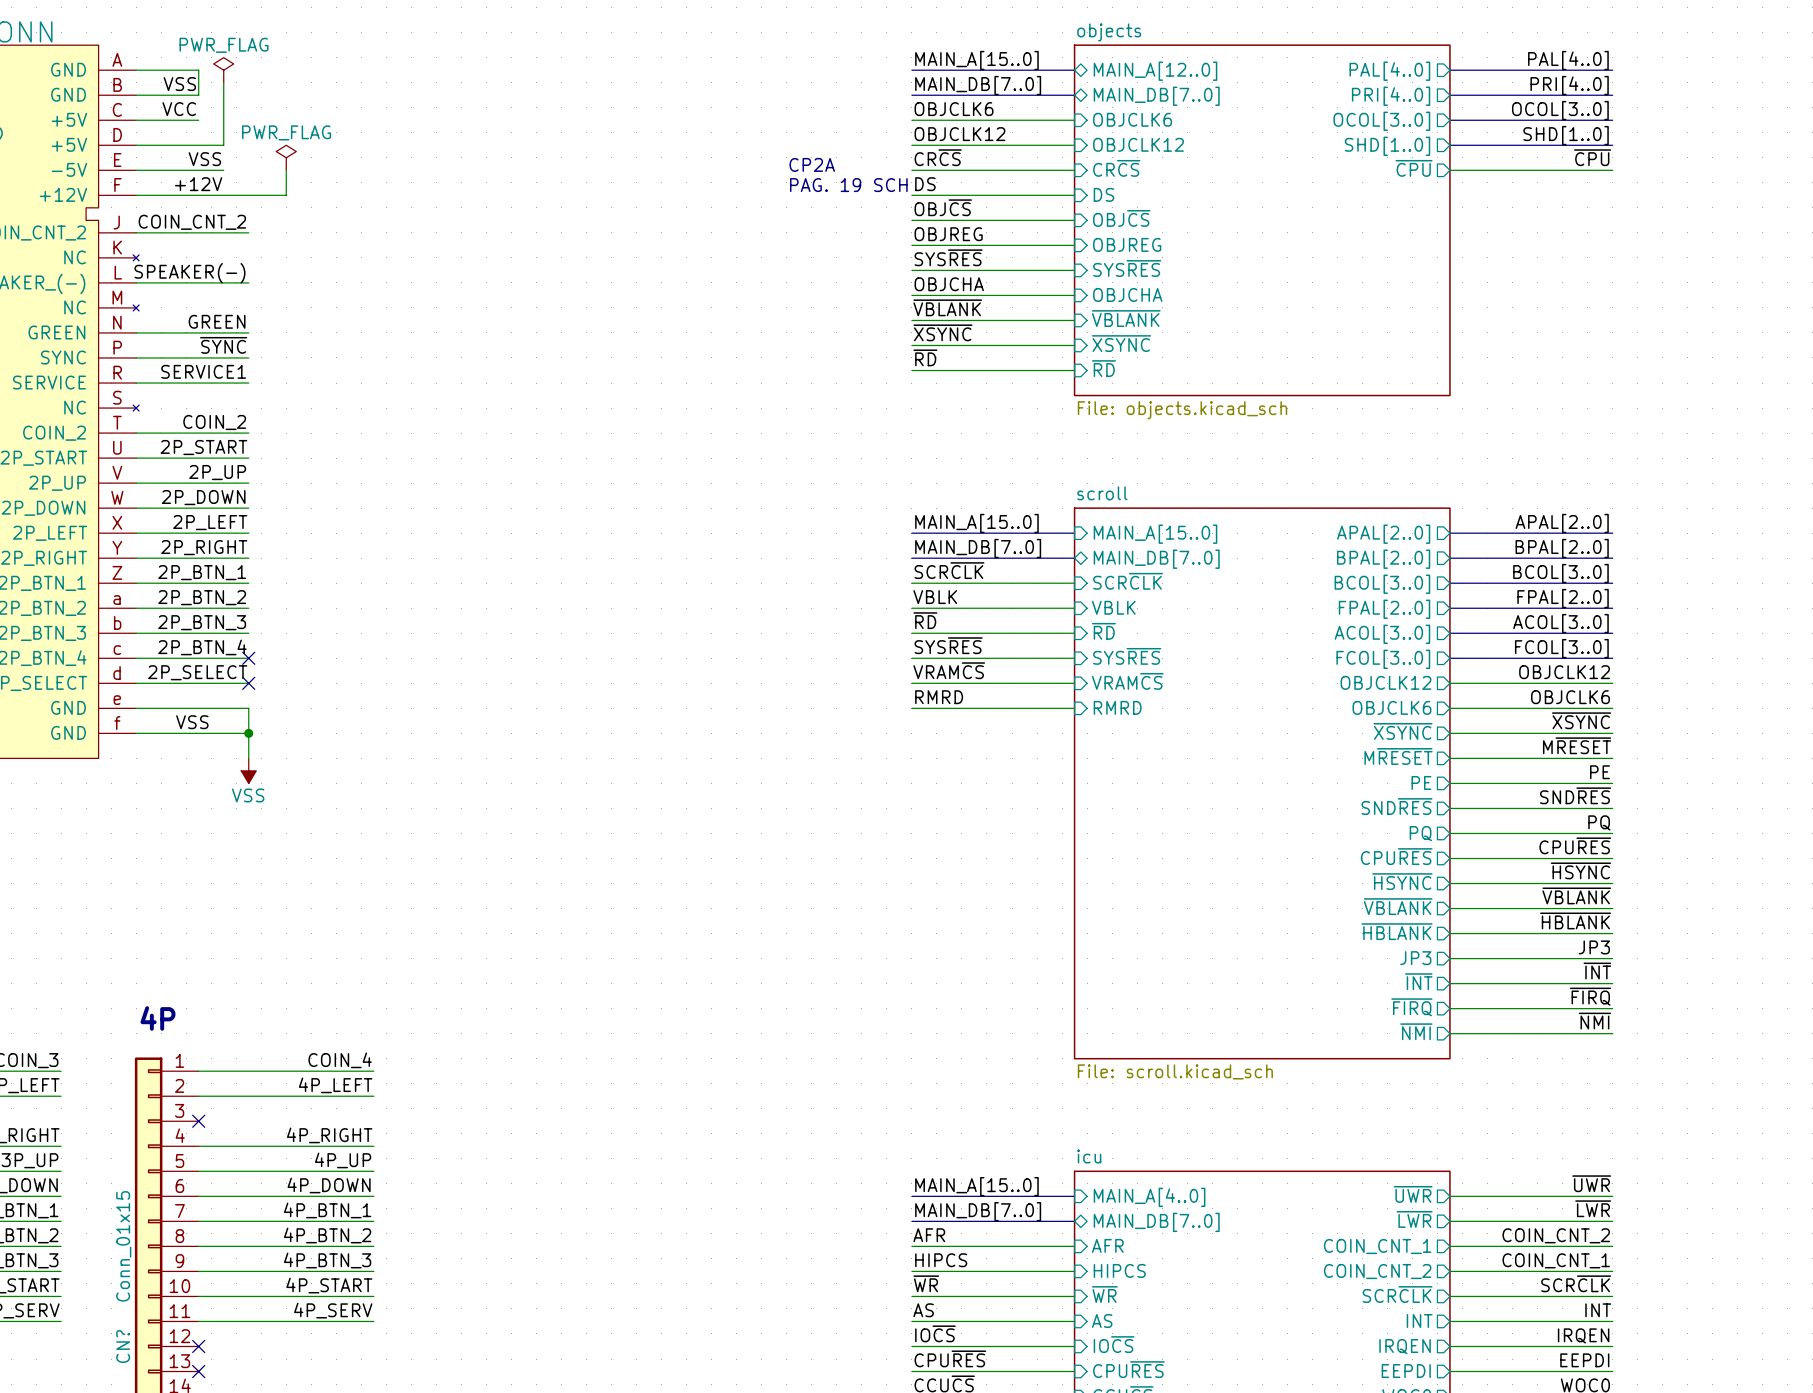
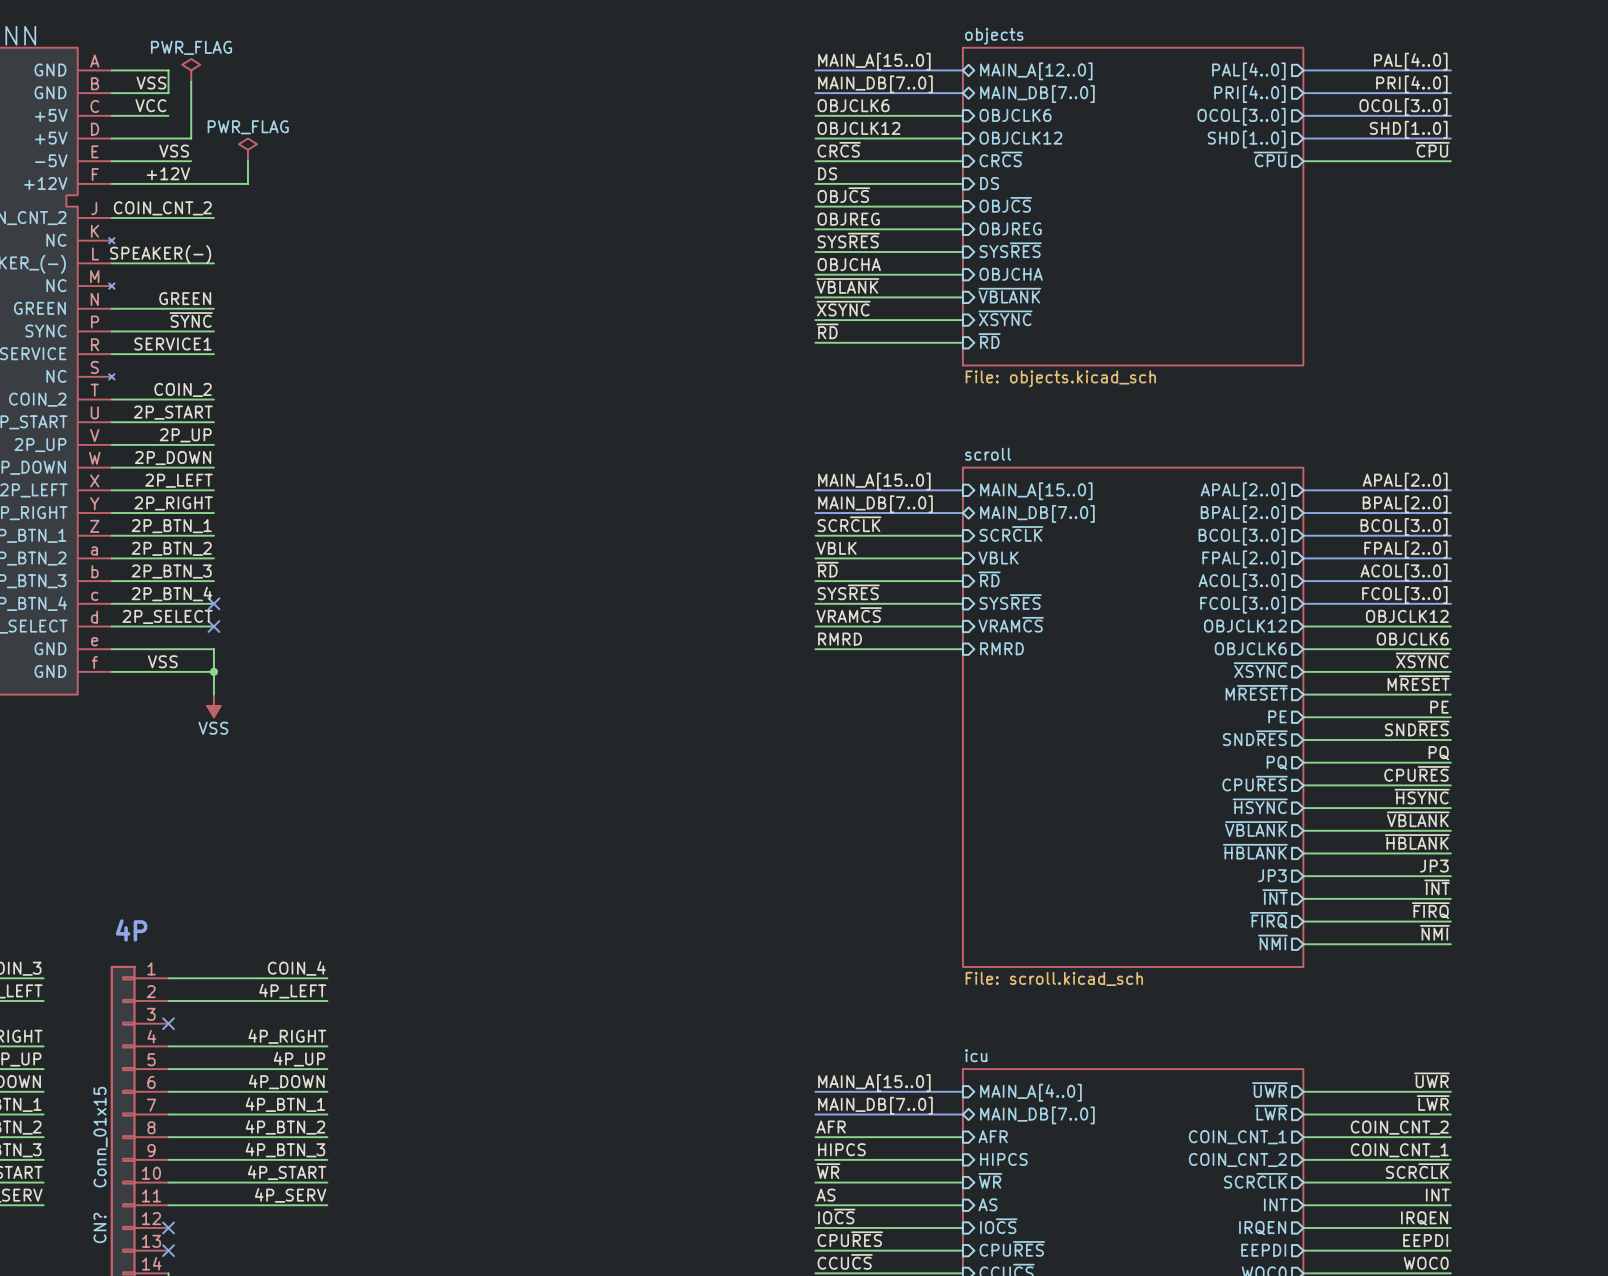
text: CP2A (812, 164) -> none
text: PAG. 19 SCH (848, 185) -> none

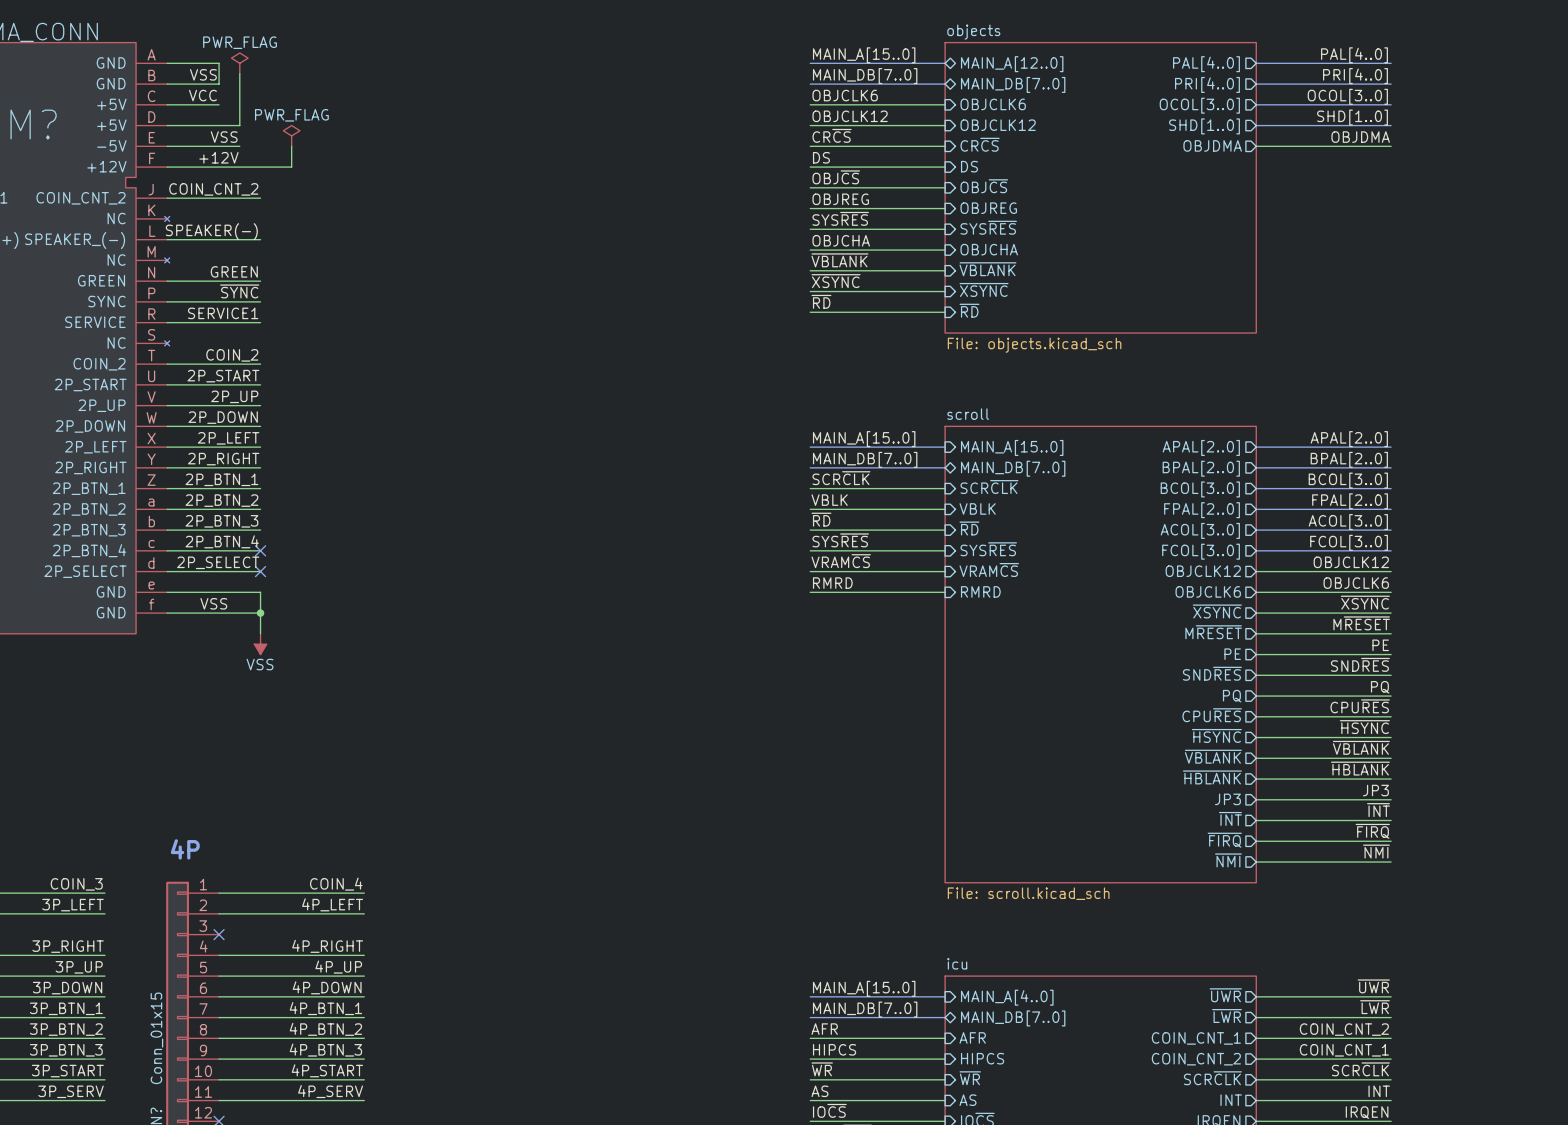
label: ~{CPU} (1432, 149) -> OBJDMA (1360, 137)
sheet pin: ~{CPU} (1270, 159) -> OBJDMA (1212, 145)

